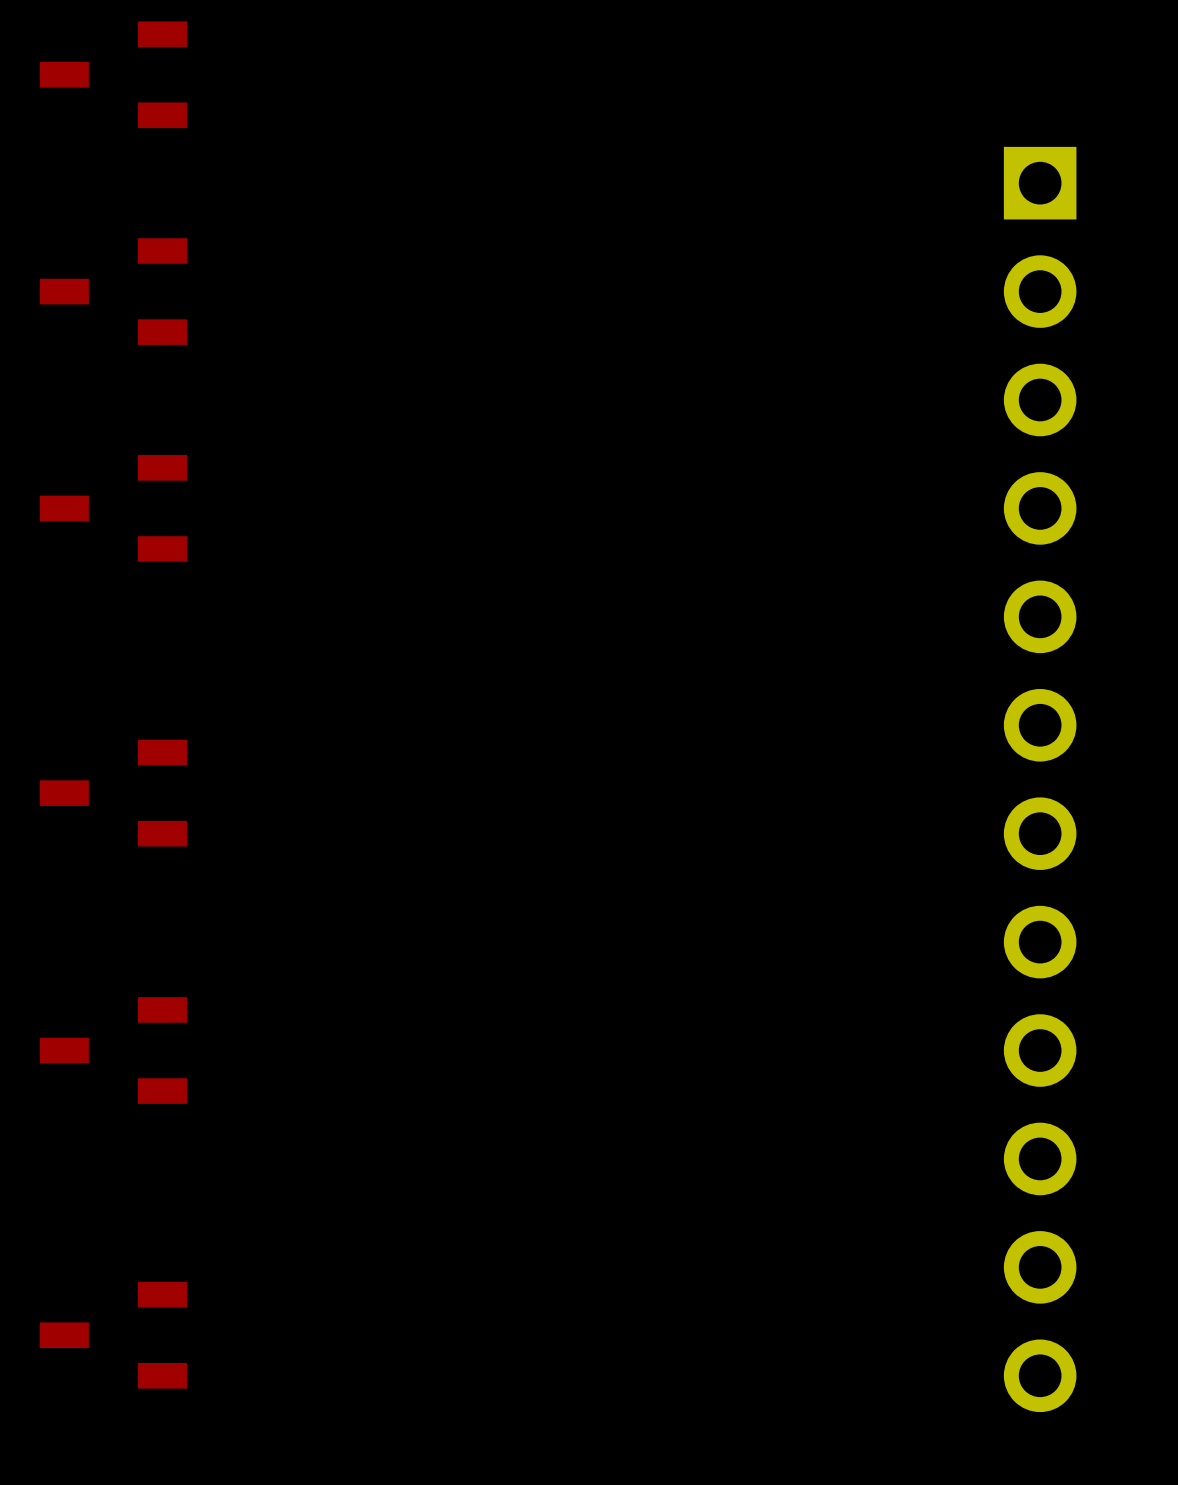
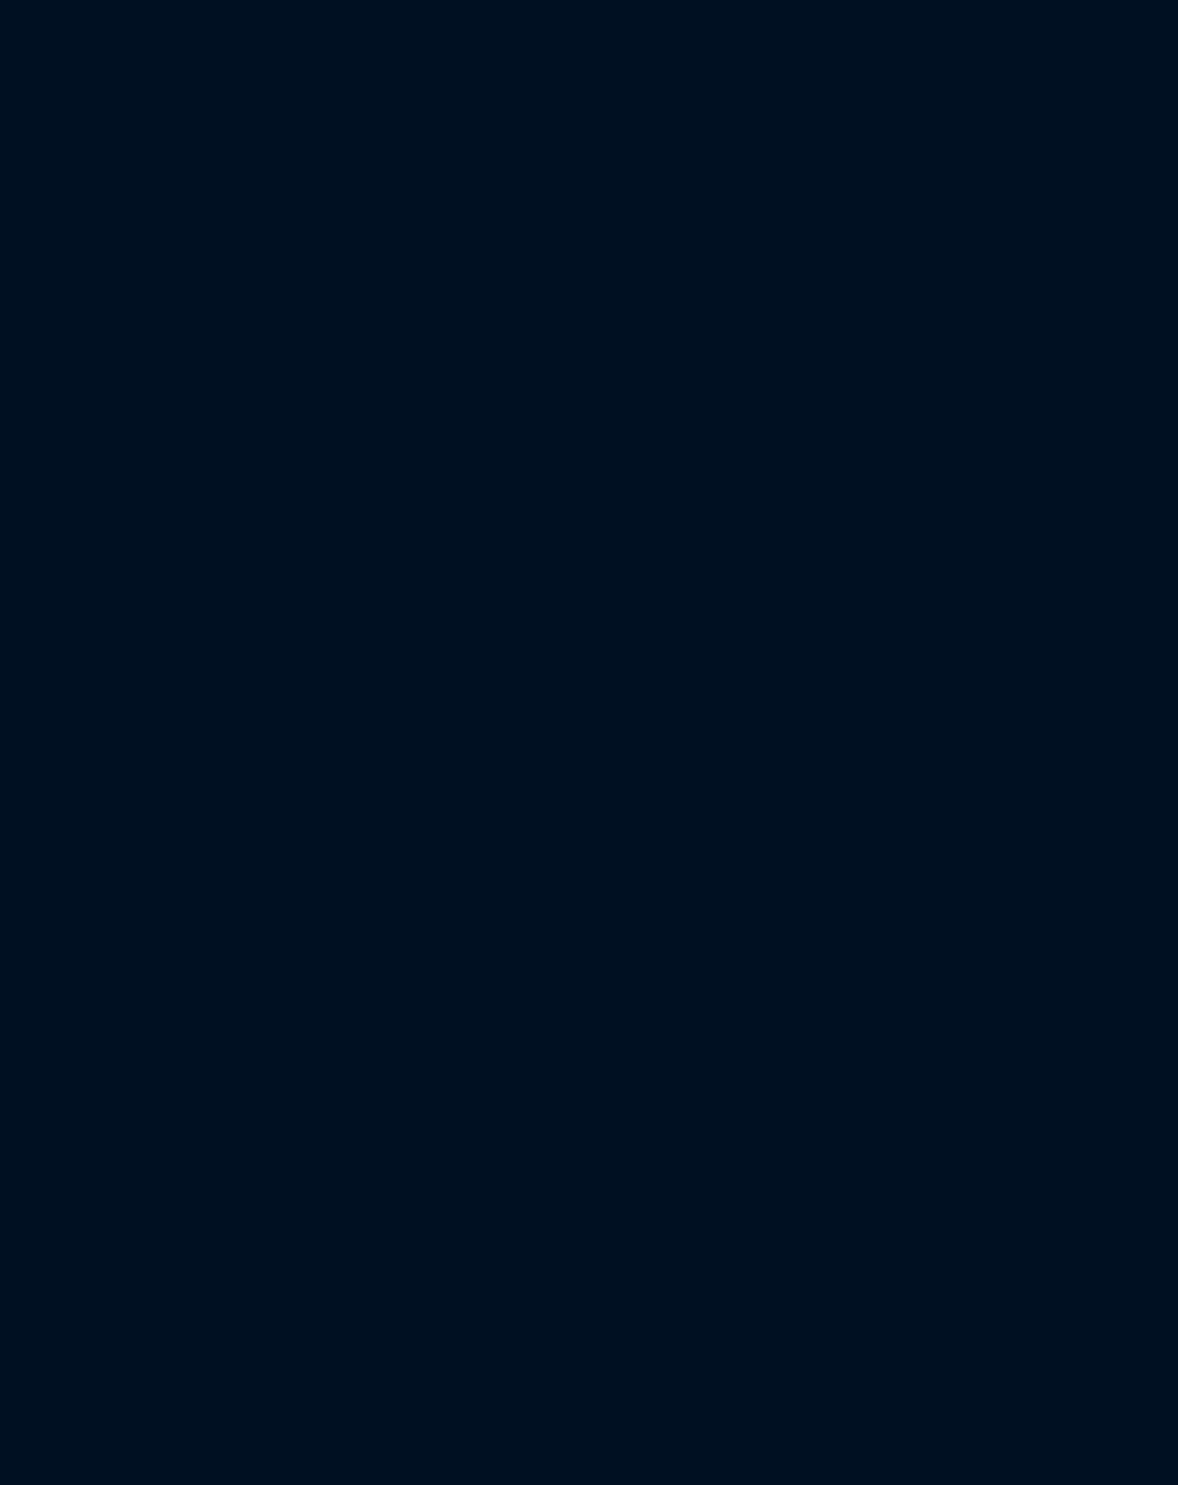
part: (113, 74) -> none
part: (113, 291) -> none
part: (113, 508) -> none
part: (1040, 779) -> none
part: (113, 793) -> none
part: (113, 1050) -> none
part: (113, 1335) -> none

